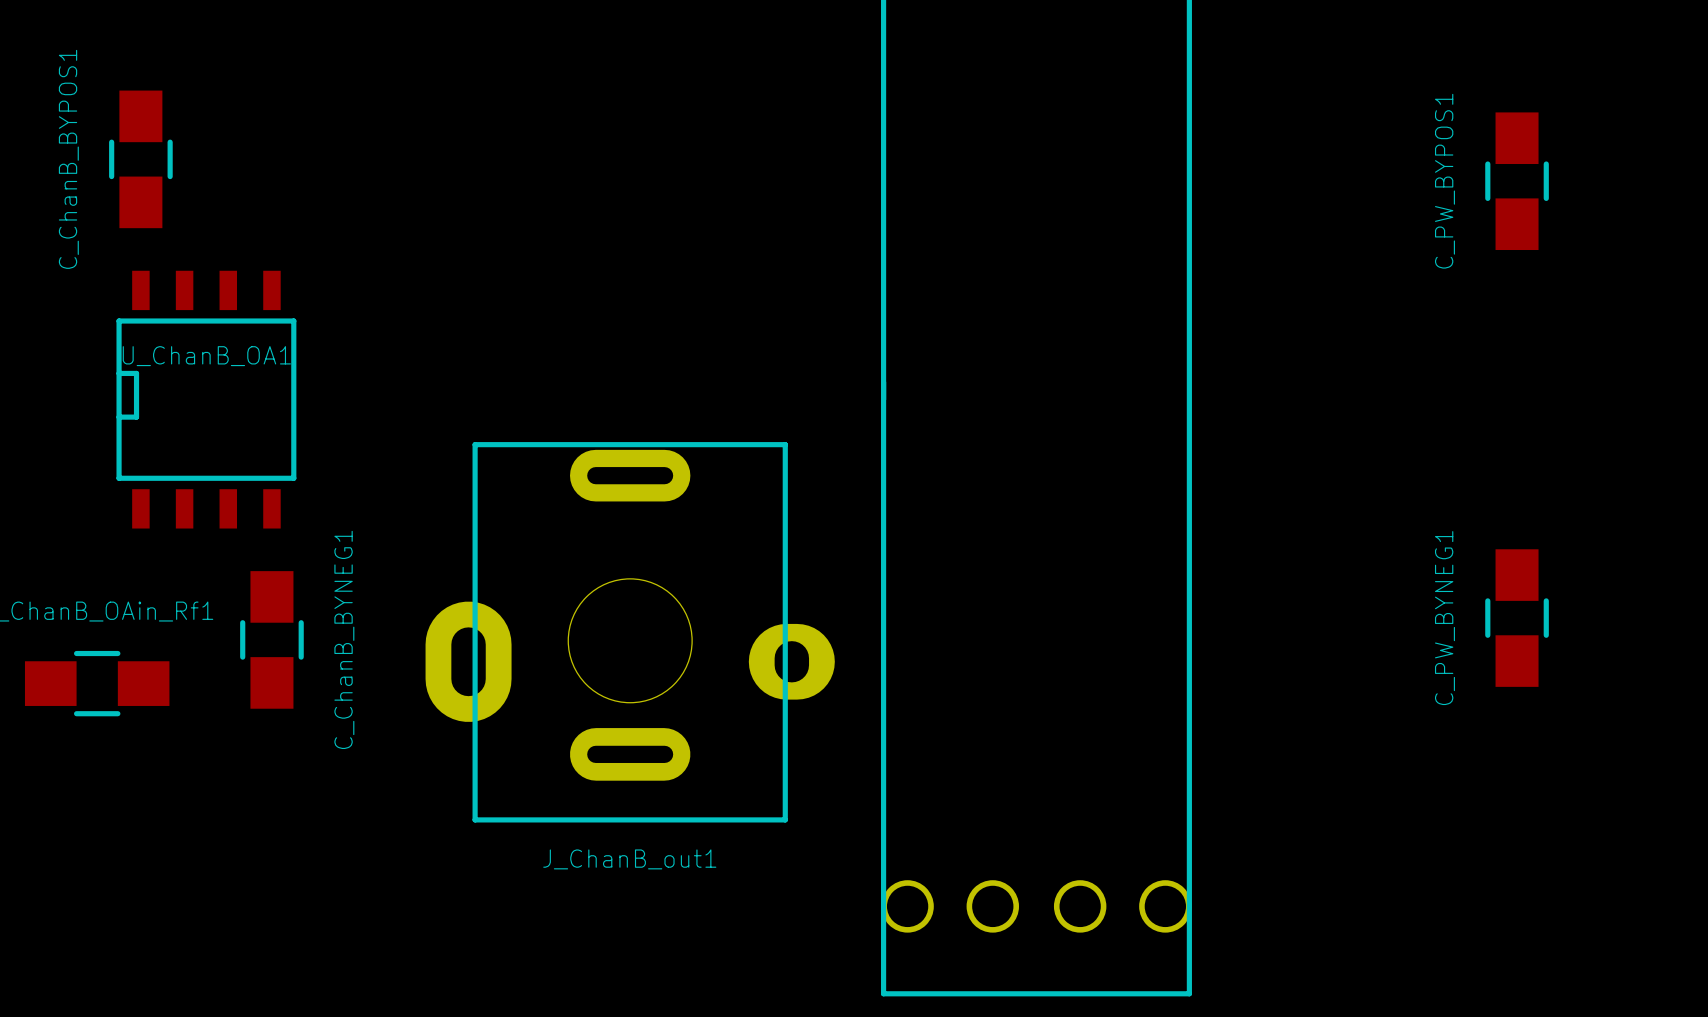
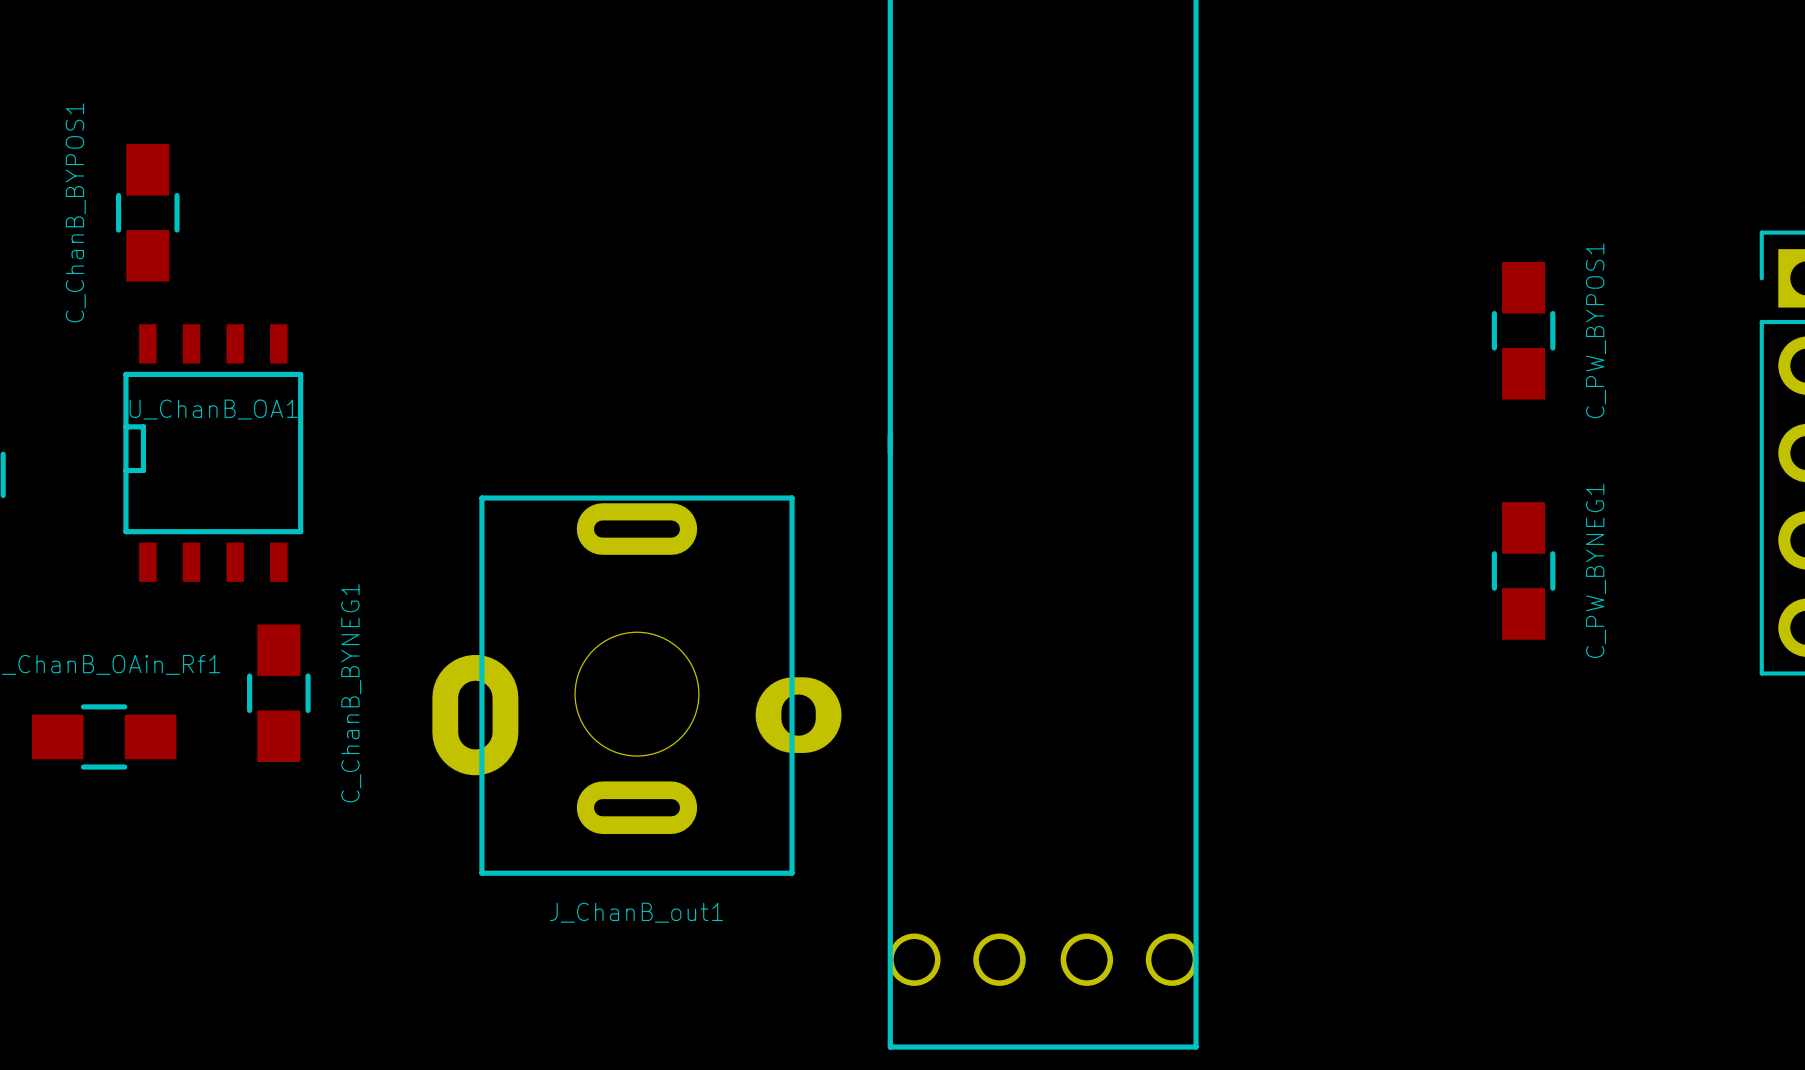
C_PW_BYPOS1 name position: C_PW_BYPOS1 (1444, 181) -> C_PW_BYPOS1 (1596, 330)
C_PW_BYPOS1 position: (1517, 181) -> (1523, 330)
C_PW_BYNEG1 name position: C_PW_BYNEG1 (1444, 618) -> C_PW_BYNEG1 (1596, 570)
C_PW_BYNEG1 position: (1517, 618) -> (1523, 570)

